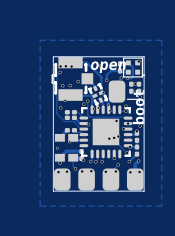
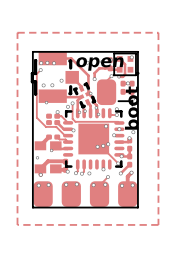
via position: (60, 107) -> (57, 112)
track: (73, 157) (73, 166) (75, 168) -> none
via: (75, 168) -> none

